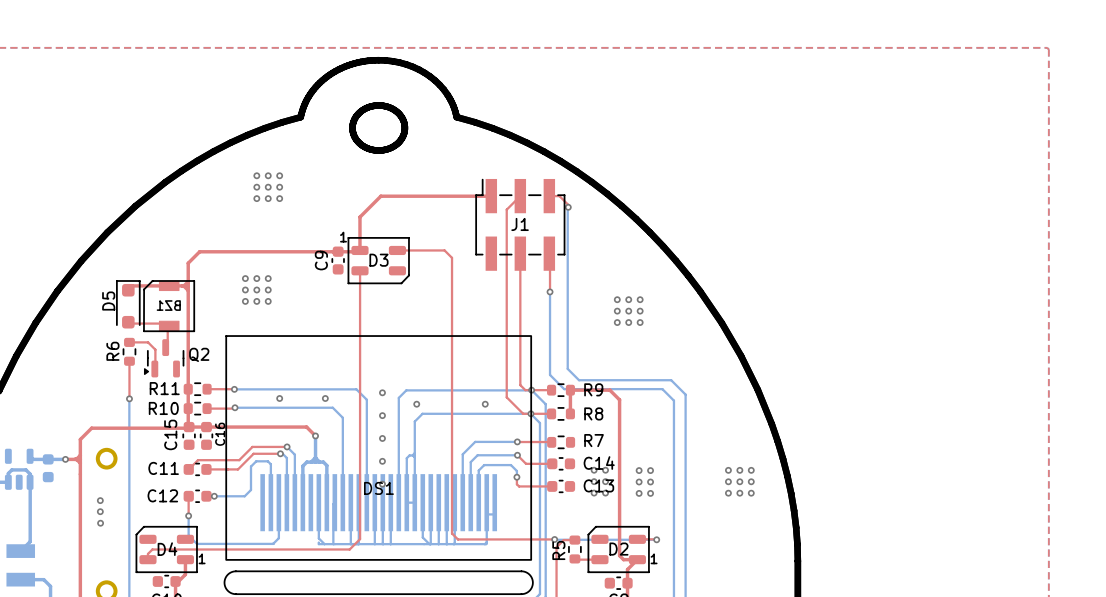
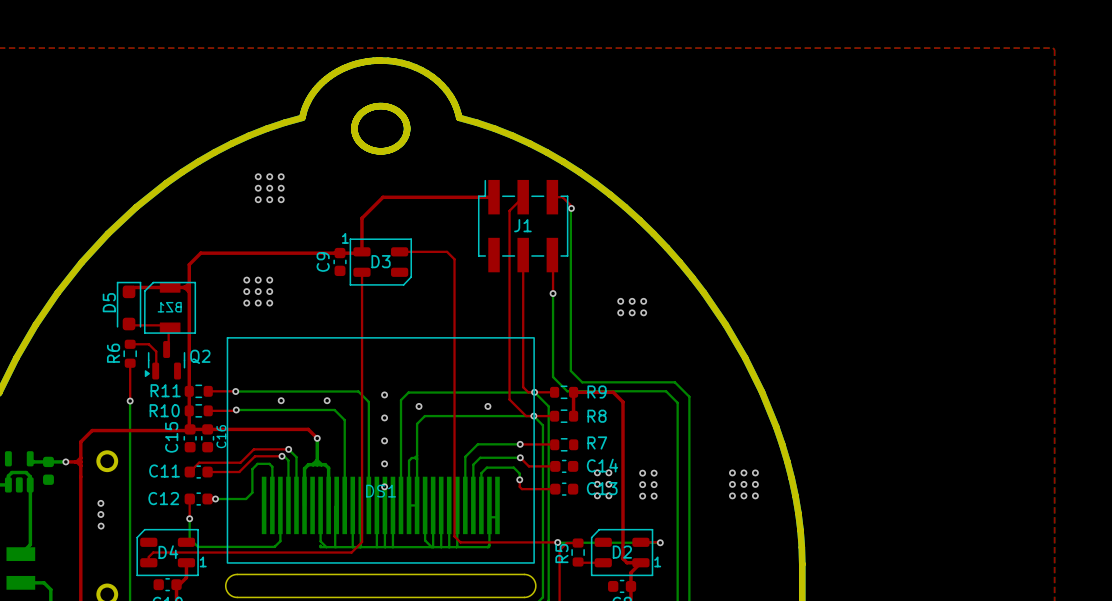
via: (617, 322) -> none
via: (628, 322) -> none
via: (640, 322) -> none

